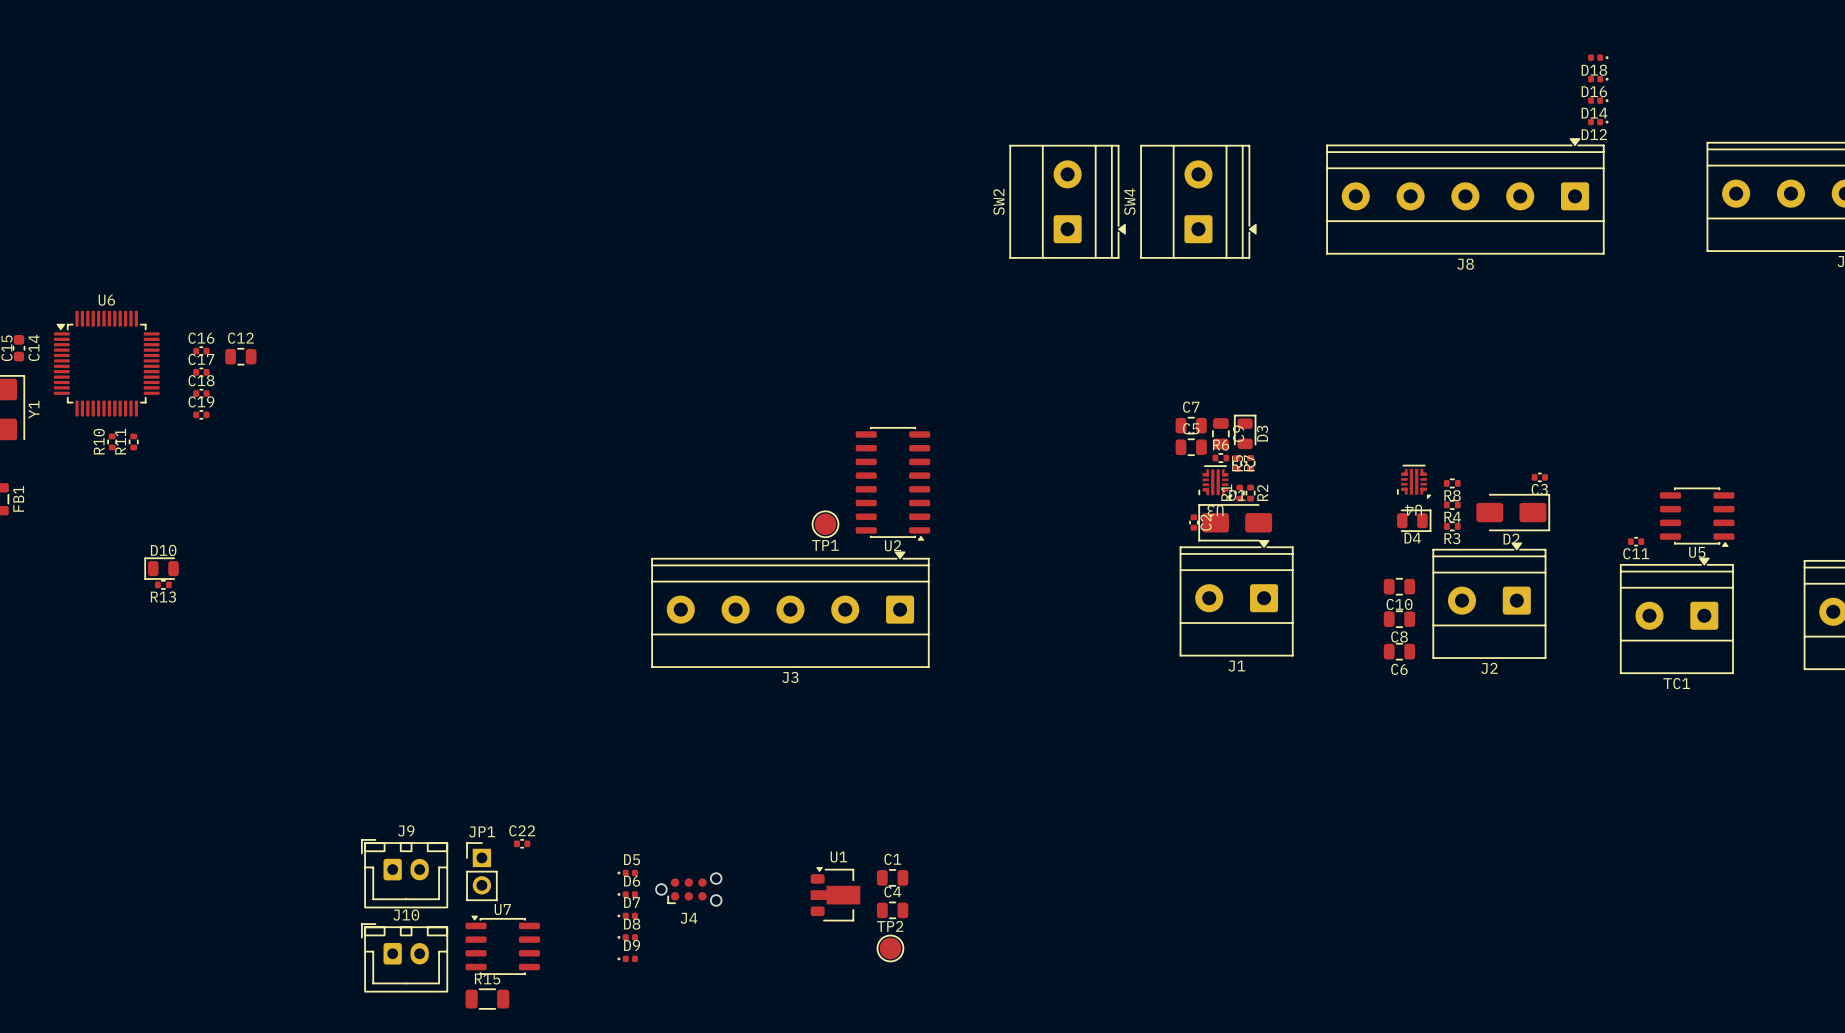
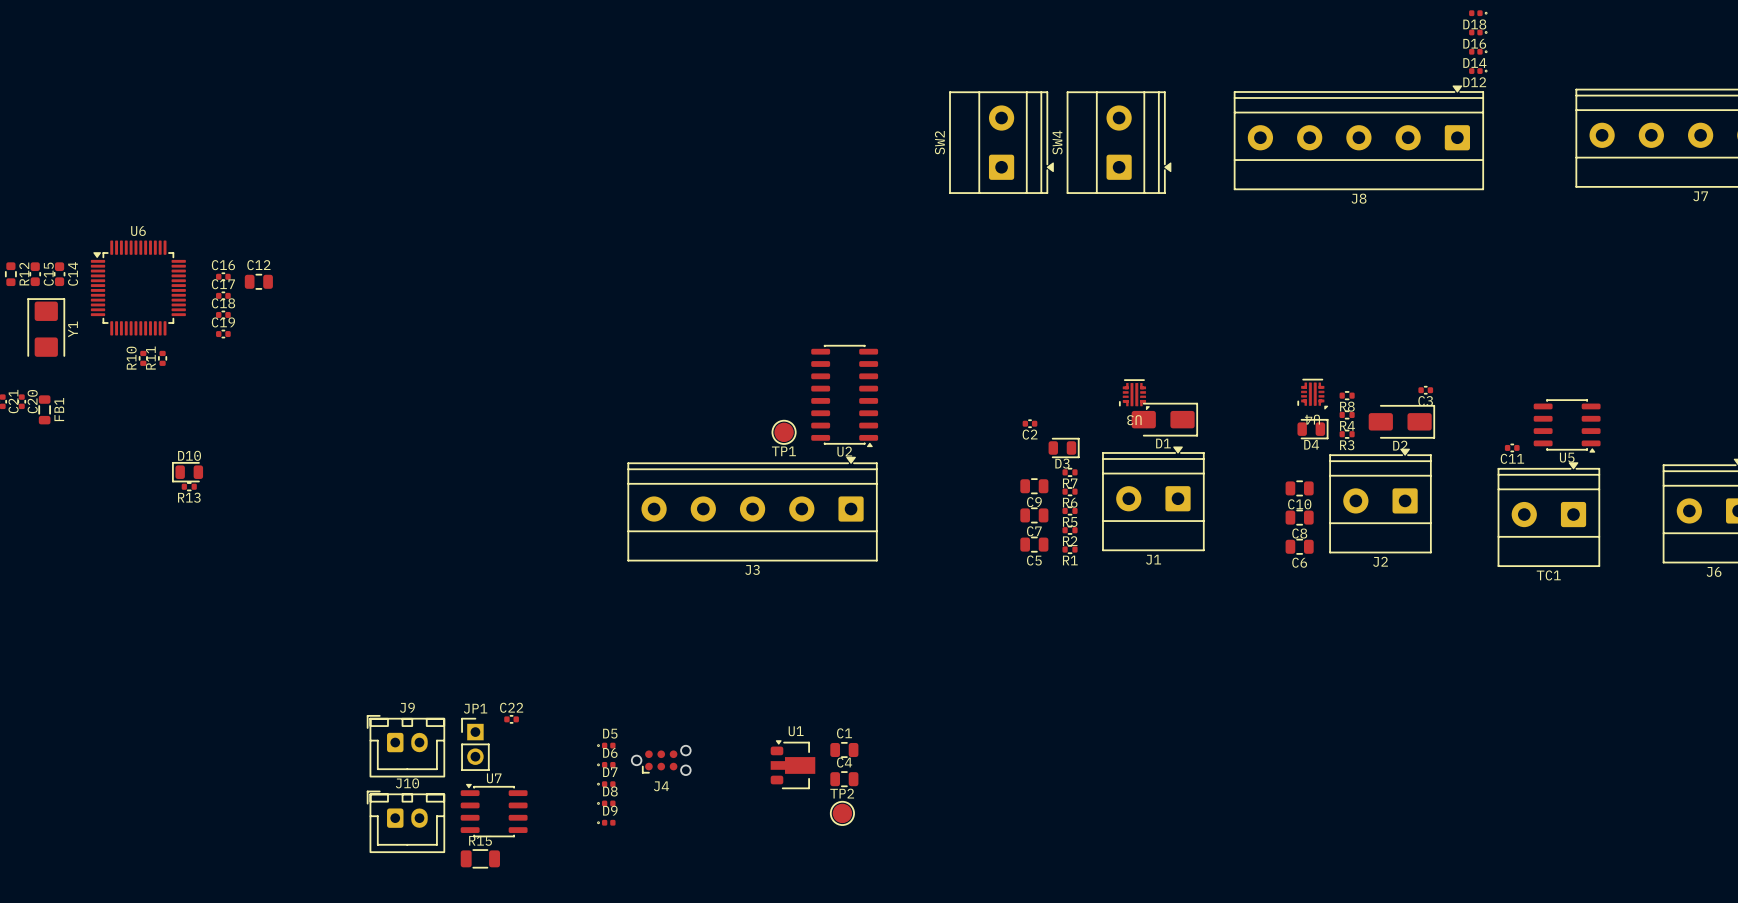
C7 name position: C7 (1191, 407) -> C7 (1034, 531)
C7 position: (1191, 425) -> (1034, 515)
C5 name position: C5 (1191, 428) -> C5 (1034, 560)
D3 rotation: 0° (1245, 432) -> 90° clockwise (1063, 447)
D3 position: (1245, 432) -> (1063, 447)
C9 rotation: 0° (1220, 433) -> 90° clockwise (1034, 486)
C9 position: (1220, 433) -> (1034, 486)
R6 name position: R6 (1221, 445) -> R6 (1070, 502)
C5 position: (1191, 447) -> (1034, 544)
R6 position: (1220, 458) -> (1070, 491)
R7 rotation: 0° (1237, 463) -> 90° clockwise (1070, 472)
R7 position: (1237, 463) -> (1070, 472)
R5 rotation: 0° (1250, 463) -> 90° clockwise (1070, 510)
R5 position: (1250, 463) -> (1070, 510)
R1 rotation: 0° (1239, 493) -> 90° clockwise (1070, 549)
R1 position: (1239, 493) -> (1070, 549)
R2 rotation: 0° (1250, 493) -> 90° clockwise (1070, 530)
R2 position: (1250, 493) -> (1070, 530)
C2 rotation: 0° (1193, 522) -> 90° clockwise (1030, 423)
C2 position: (1193, 522) -> (1030, 423)
D1 rotation: 0° (1235, 522) -> 180° (1164, 419)

